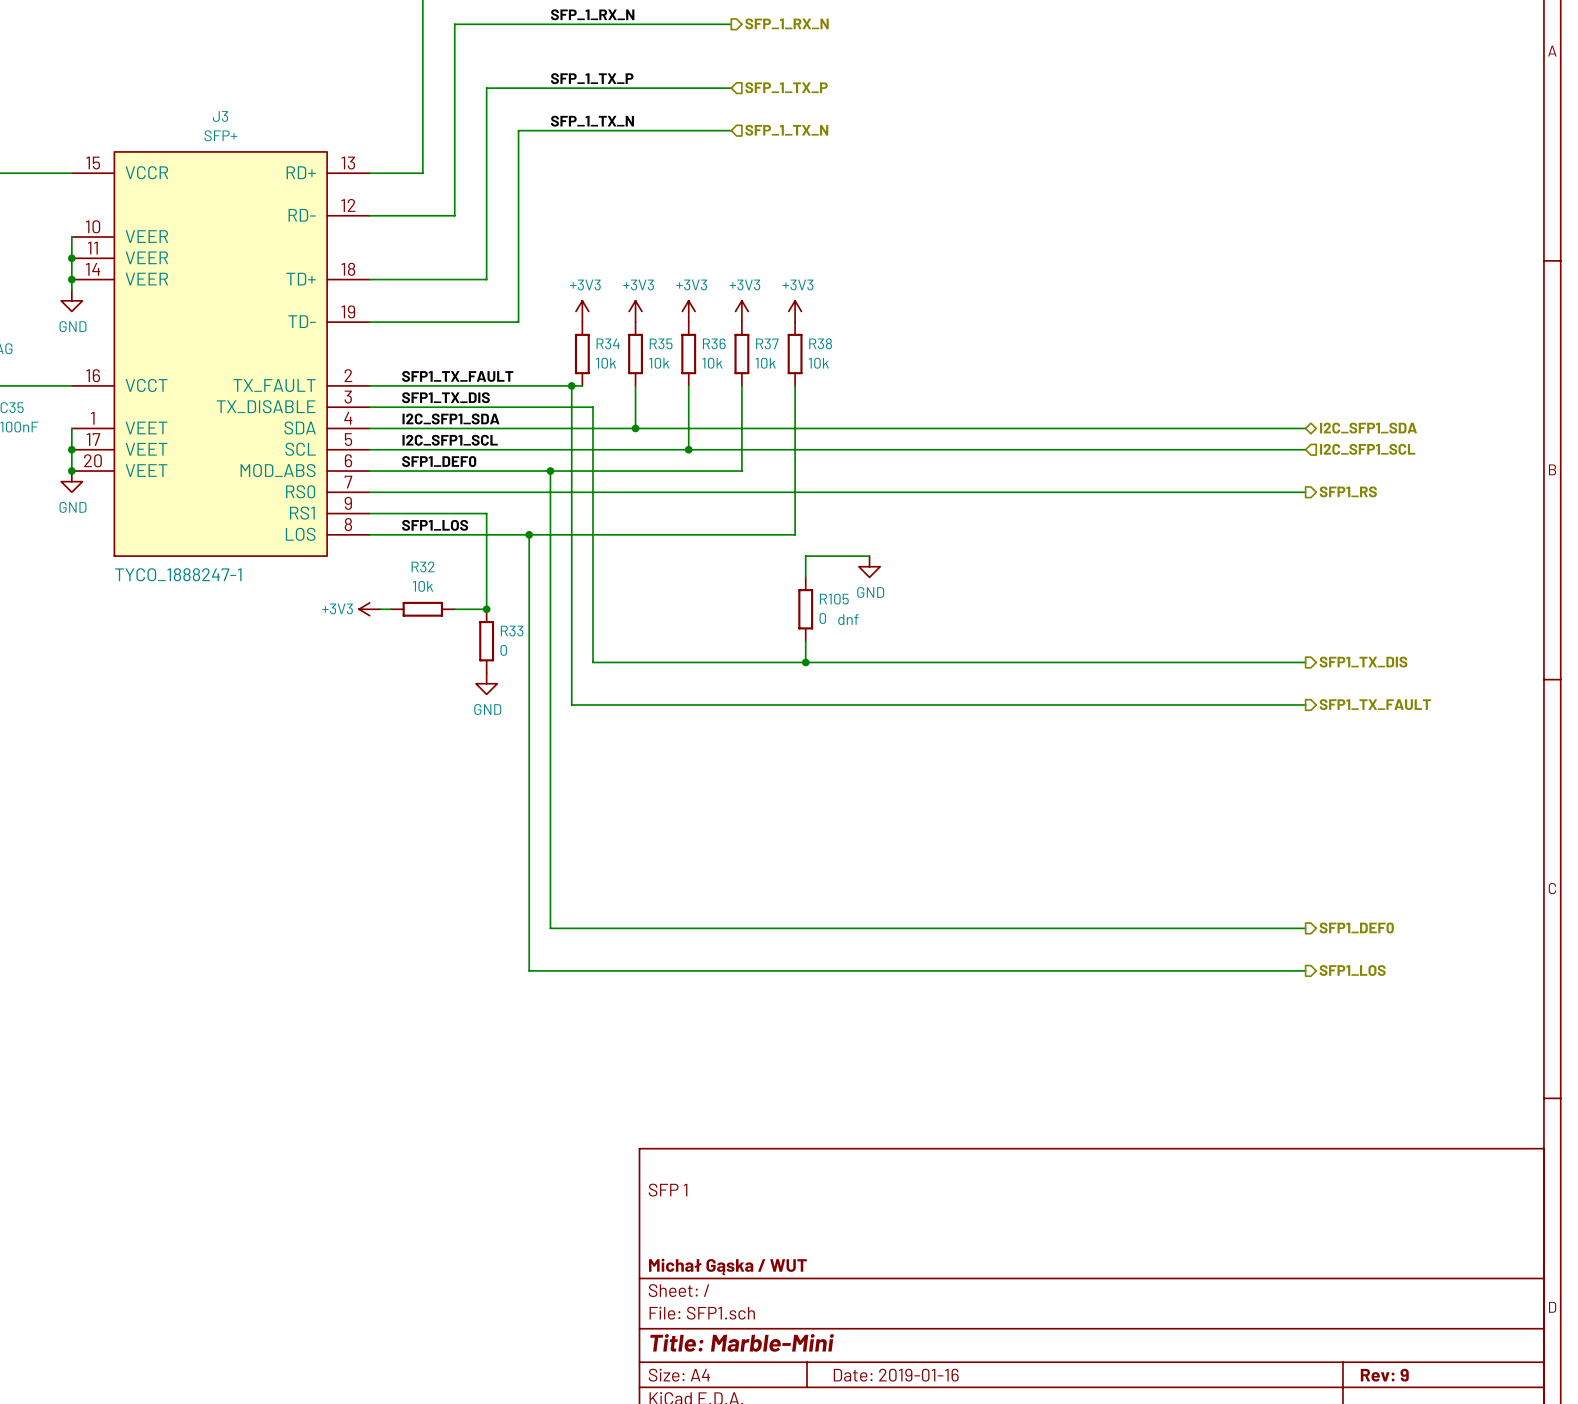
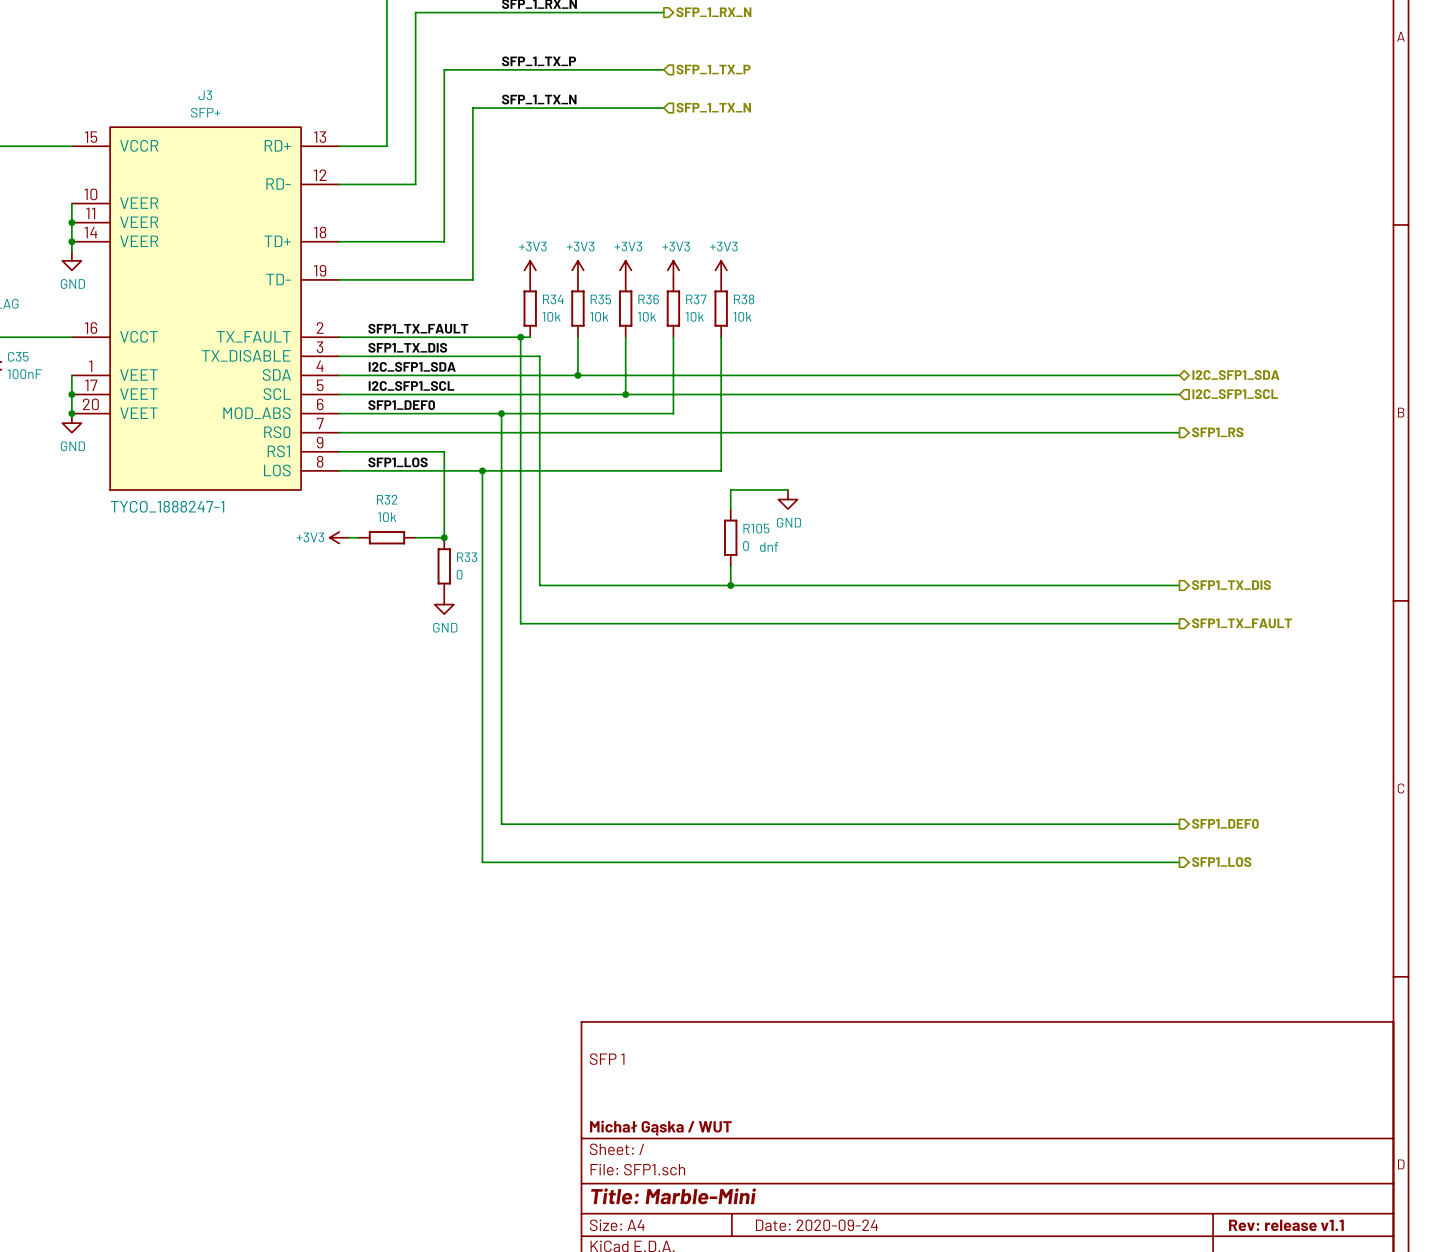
title block: Date: 2019-01-16 (896, 1375) -> Date: 2020-09-24 (816, 1225)
title block: Rev: 9 (1384, 1375) -> Rev: release v1.1 (1286, 1225)

